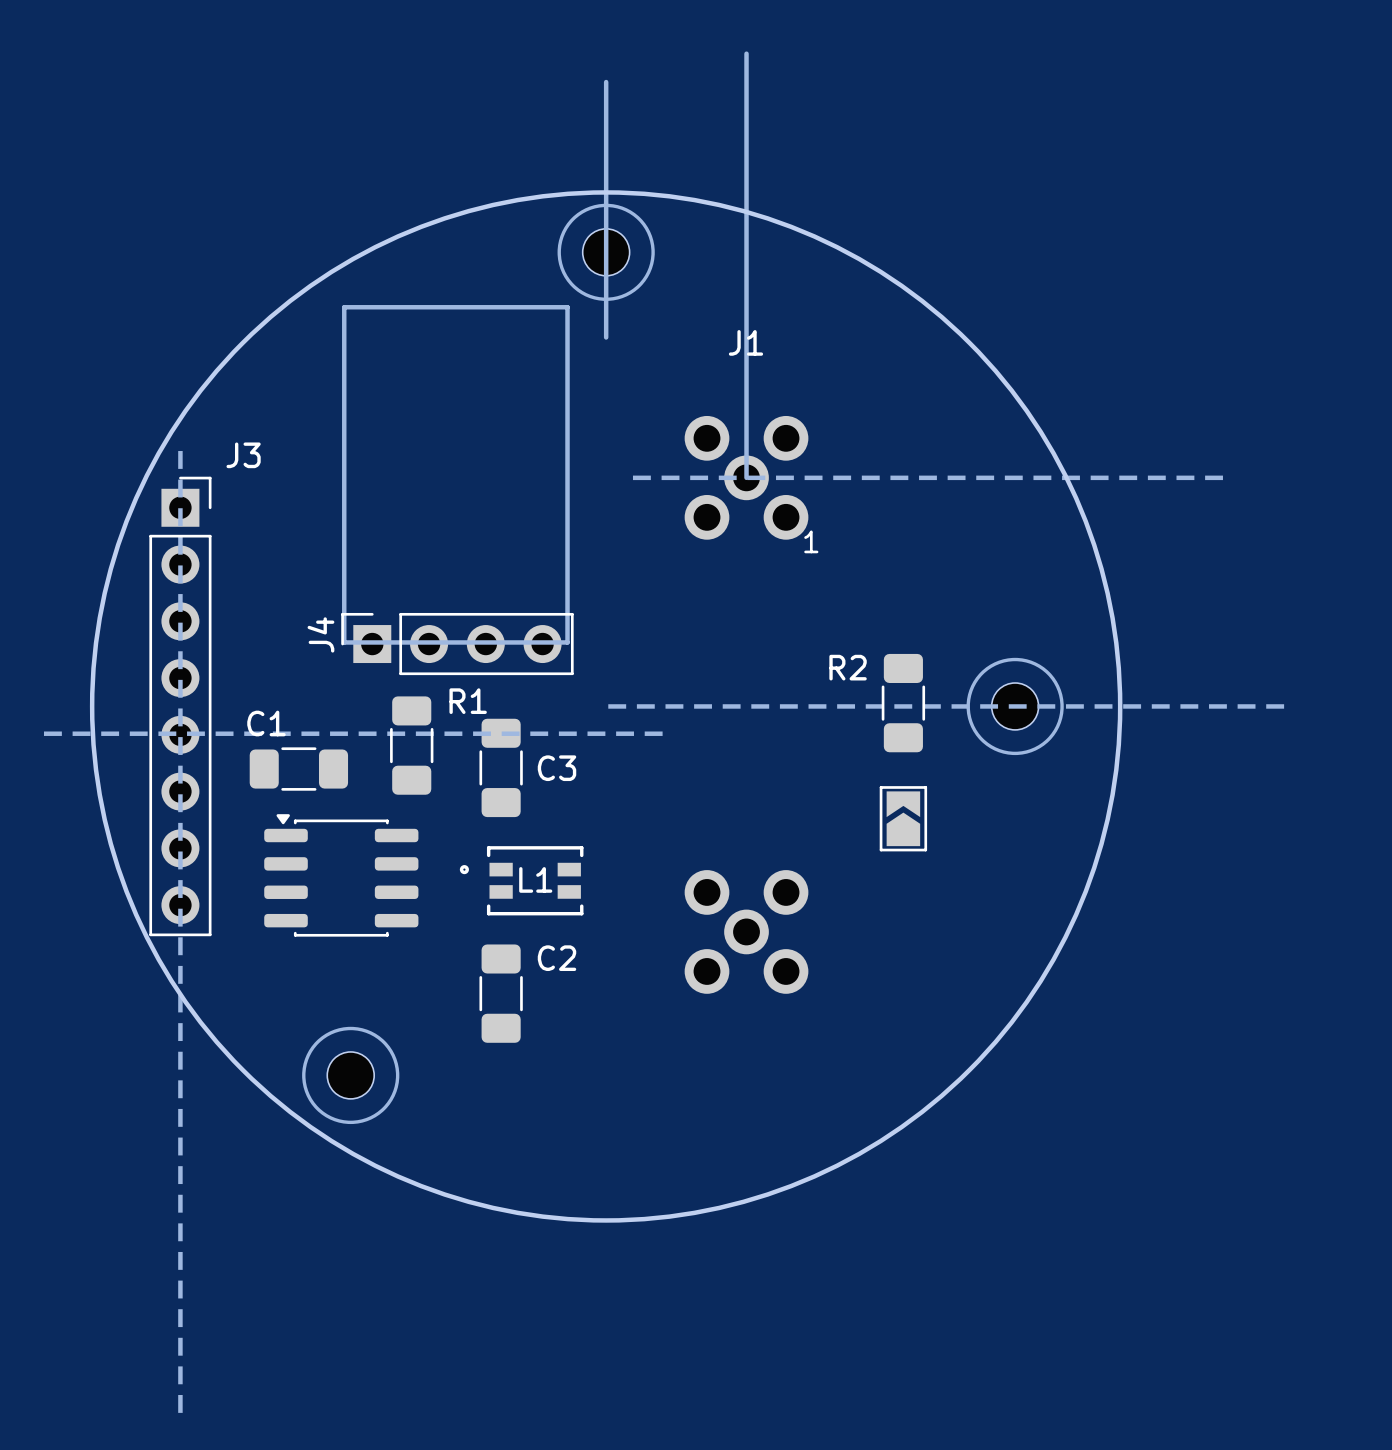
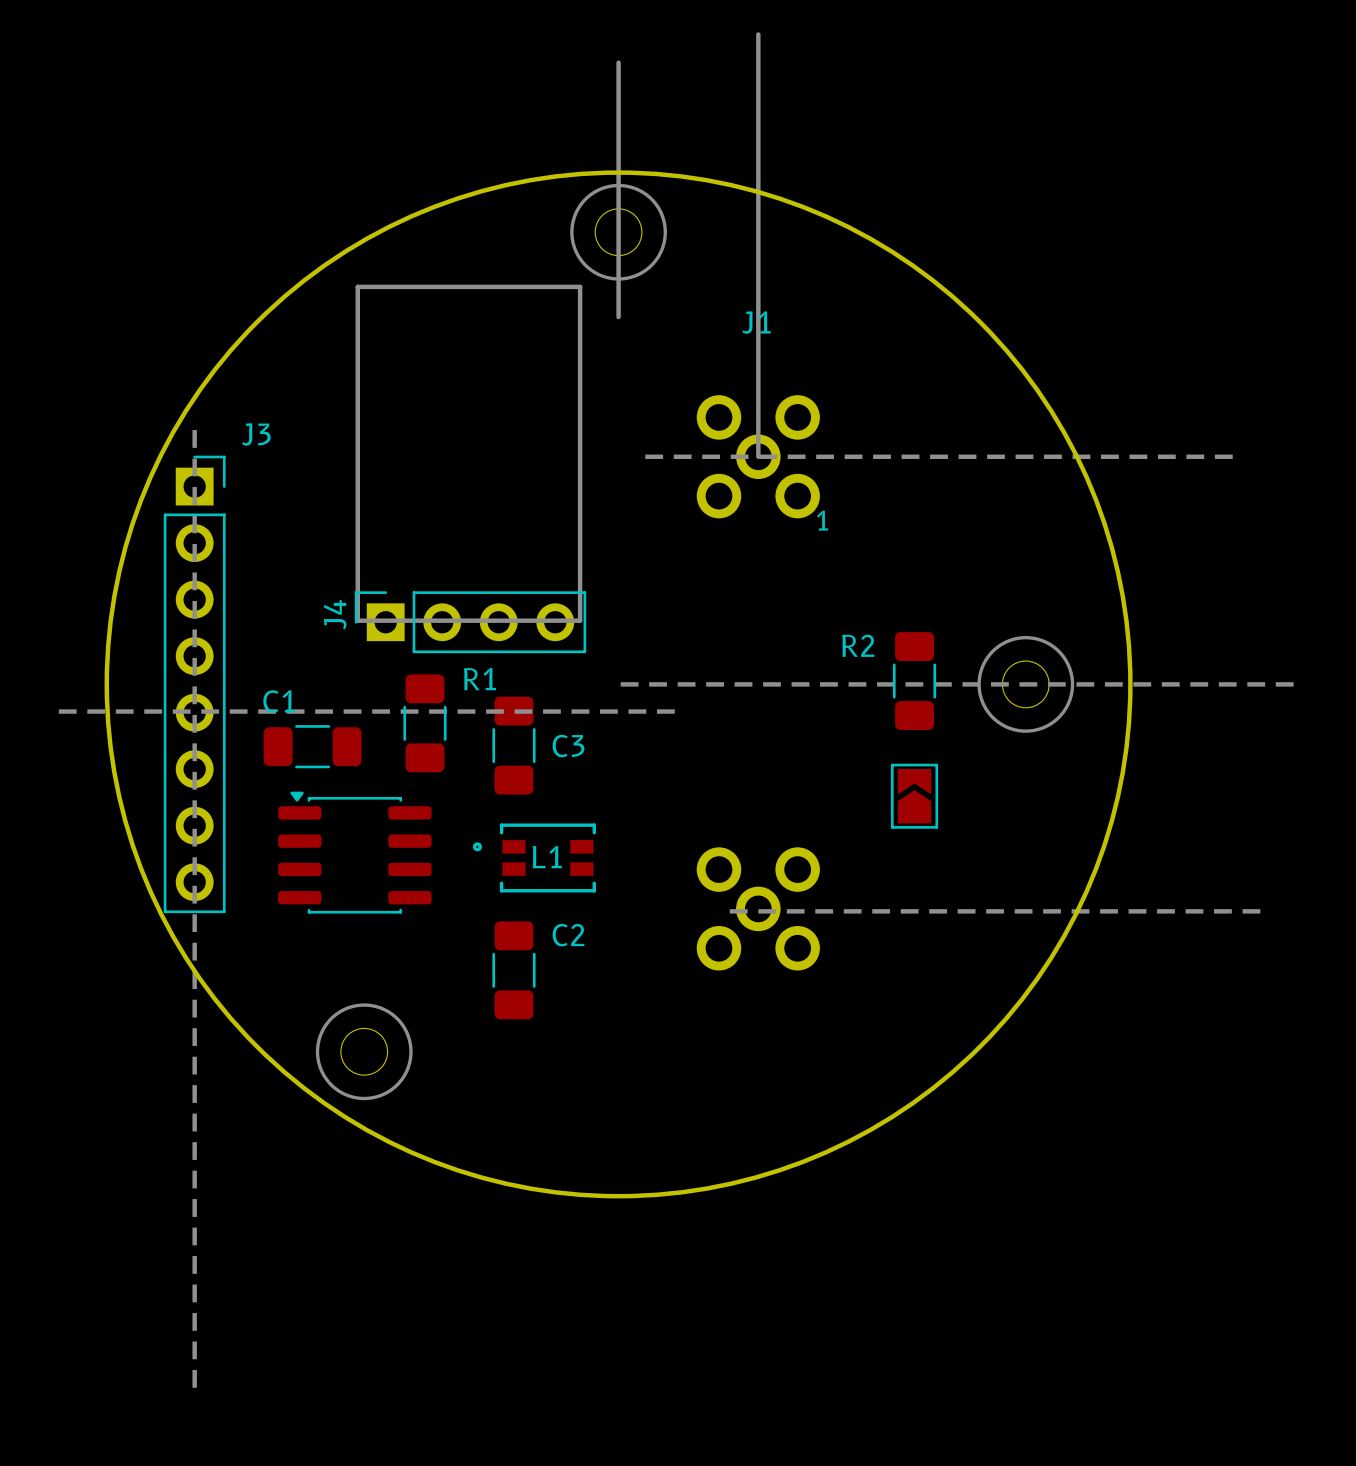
line: none -> (729, 911) (1268, 911)

